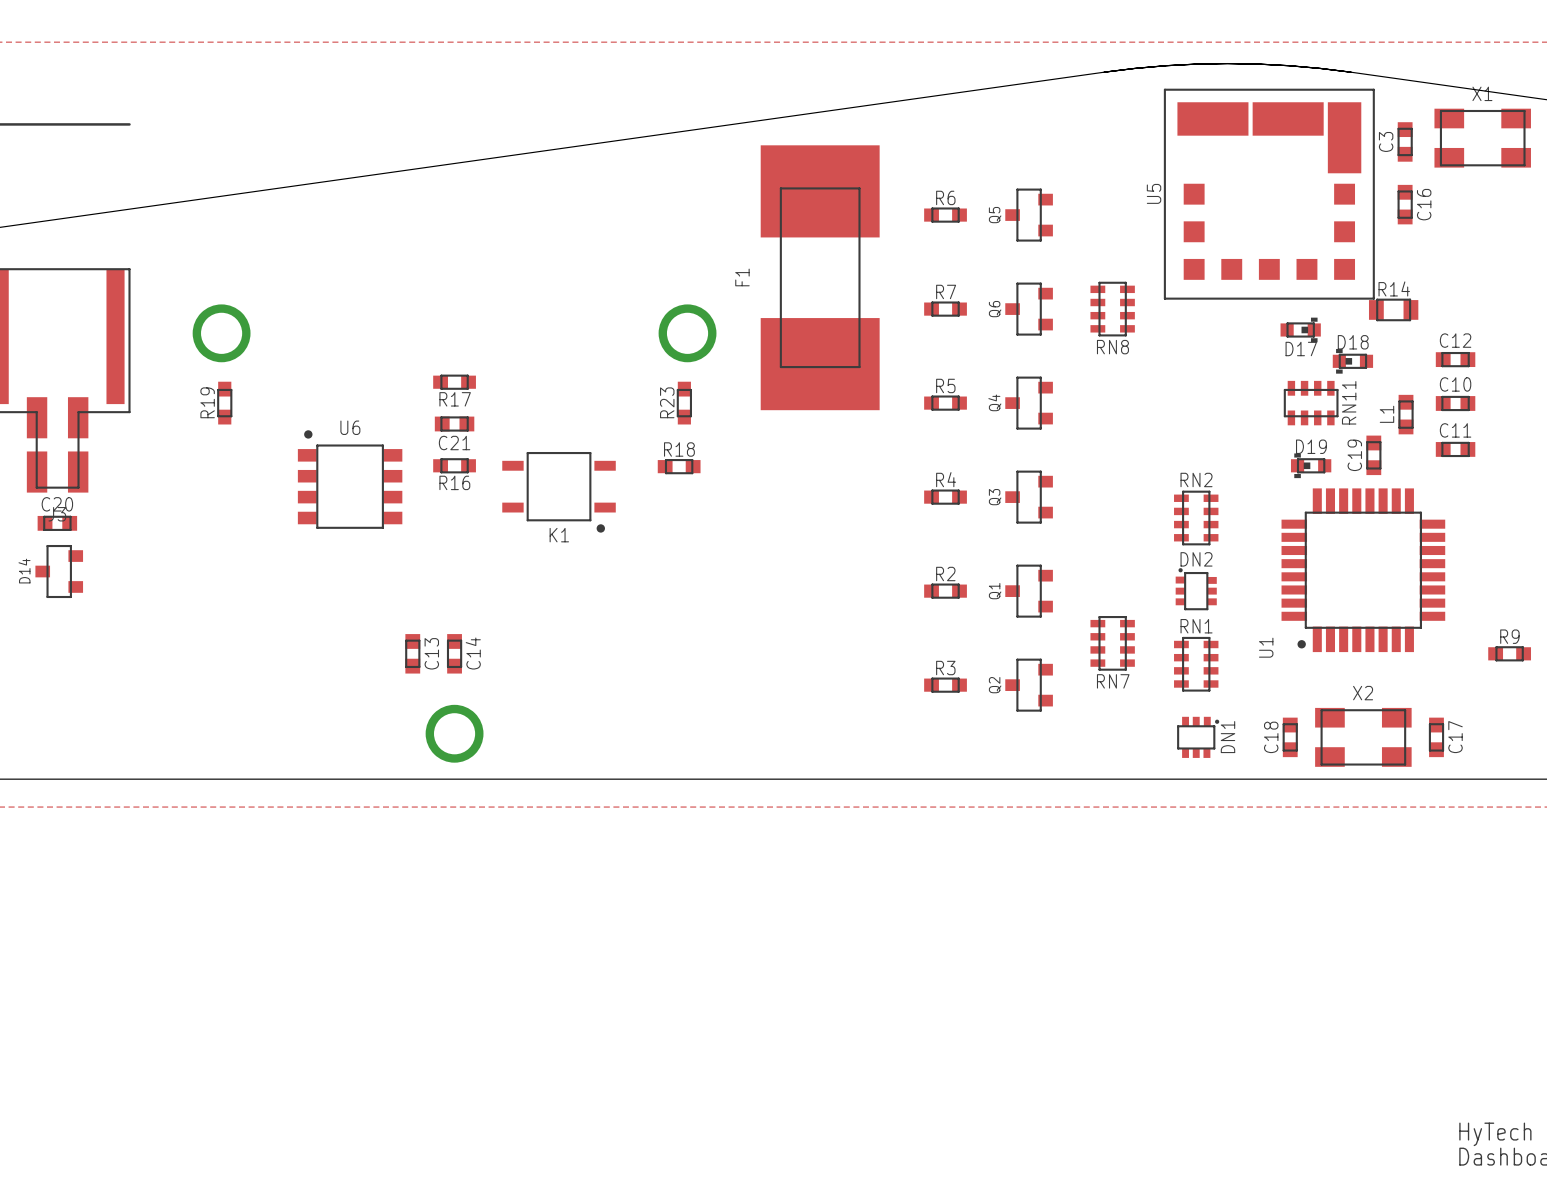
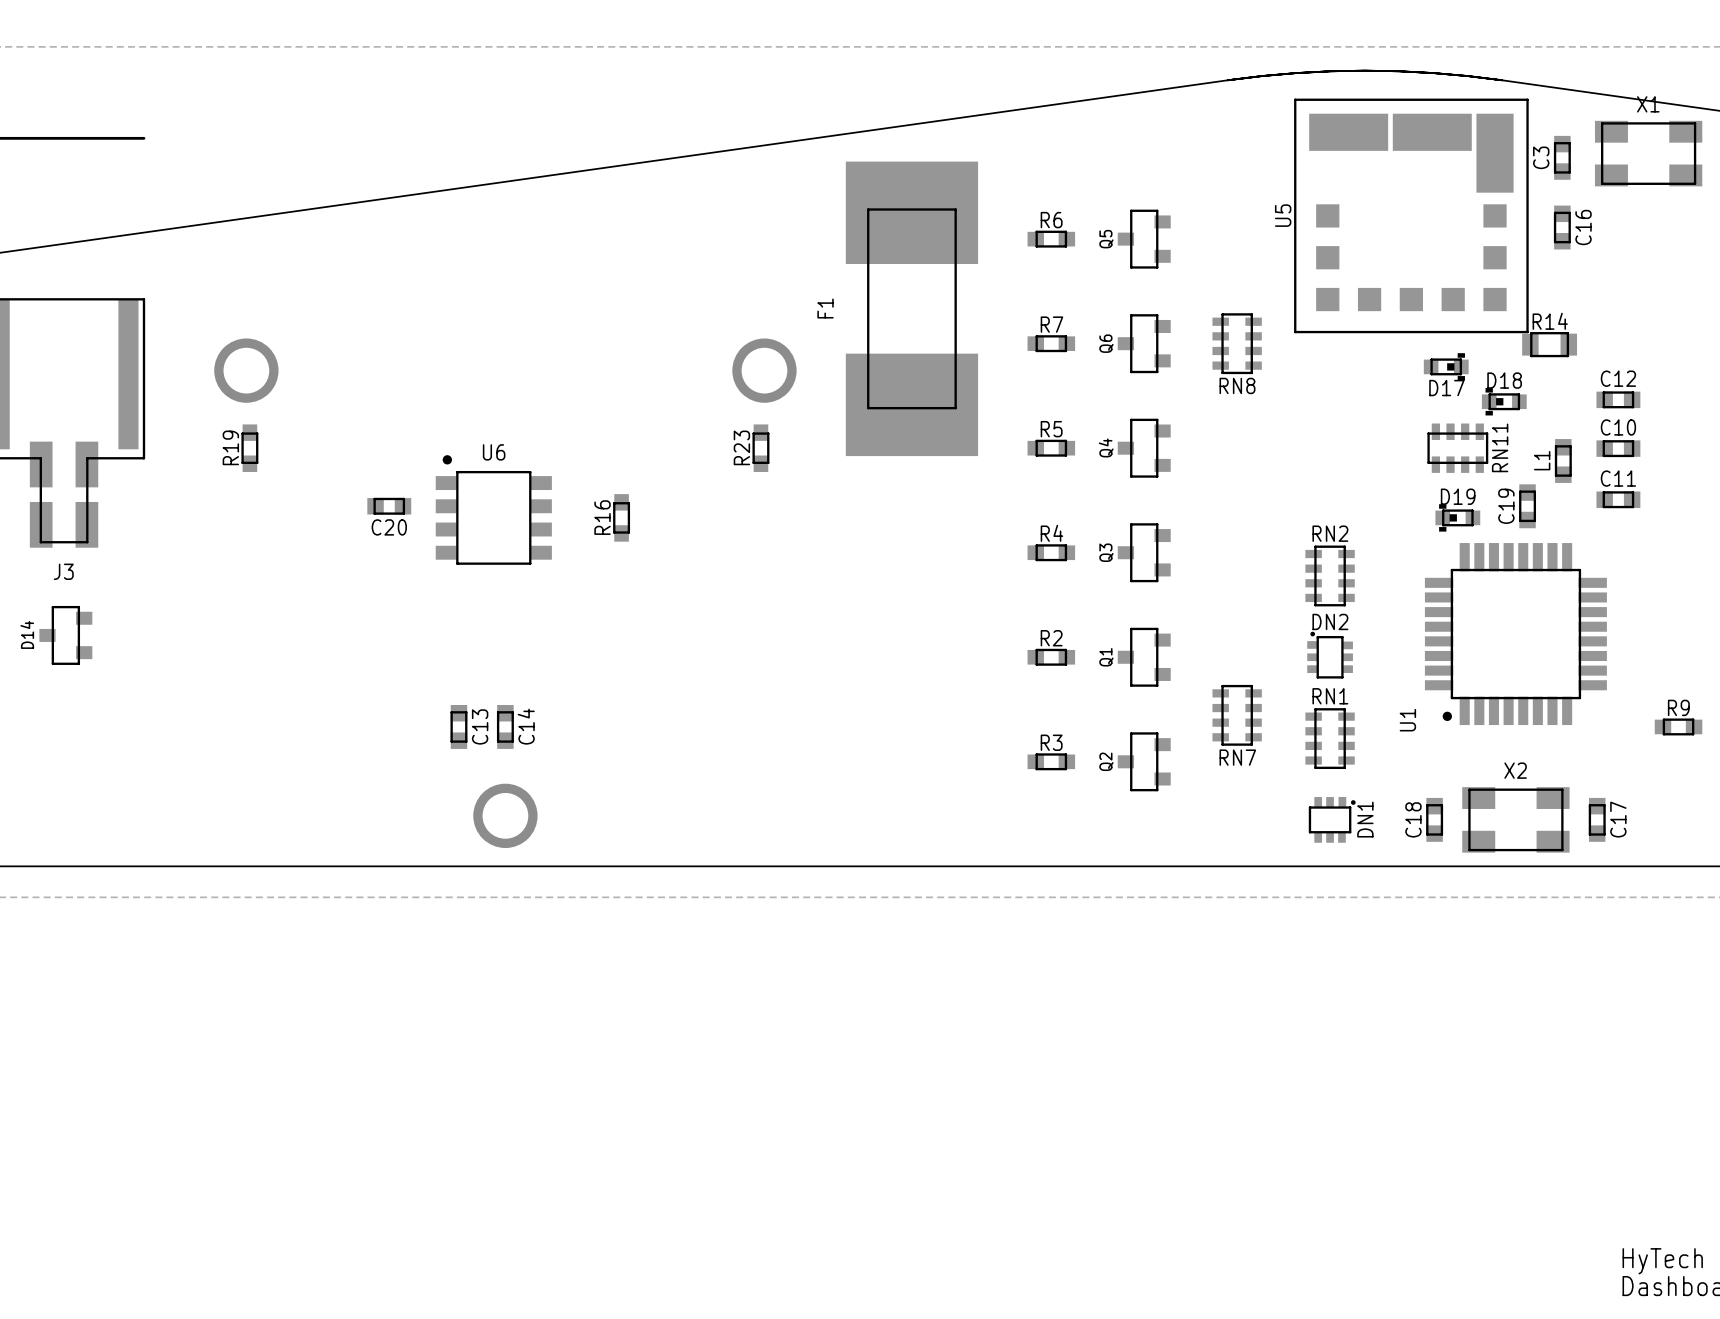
R17: (454, 382) -> none
C21: (454, 423) -> none
R16 rotation: 0° (454, 465) -> 90° clockwise (621, 517)
R16 position: (454, 465) -> (621, 517)
R18: (679, 466) -> none
U6 position: (350, 479) -> (493, 509)
K1: (559, 492) -> none
C20 name position: C20 (57, 504) -> C20 (389, 527)
C20 position: (57, 523) -> (389, 506)

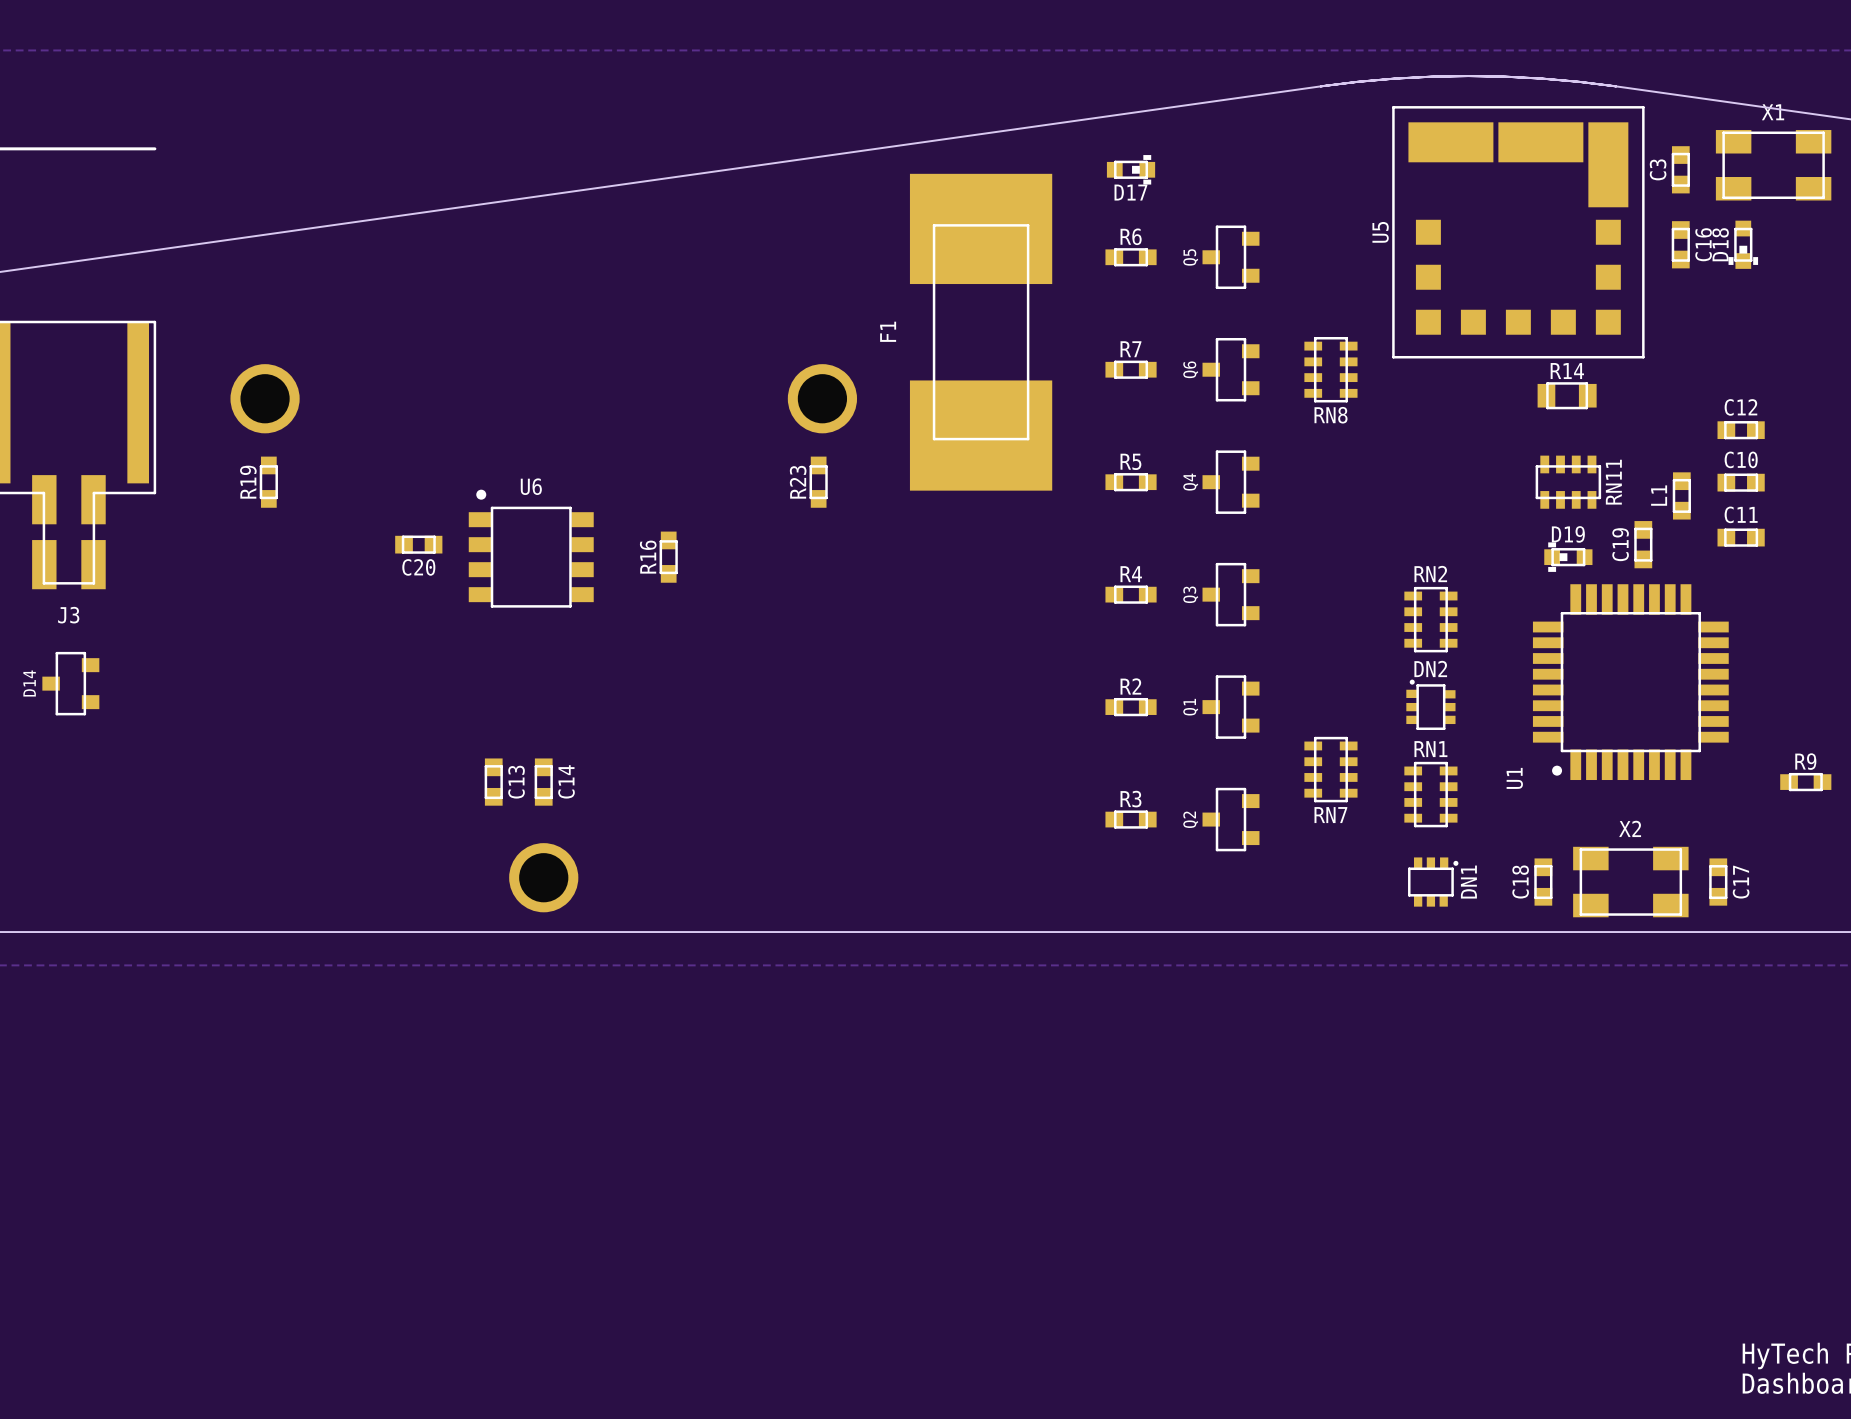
R14 position: (1549, 344) -> (1567, 395)
D17 position: (1446, 366) -> (1131, 169)
D18 rotation: 0° (1504, 401) -> 90° counterclockwise (1743, 244)
D18 position: (1504, 401) -> (1743, 244)

